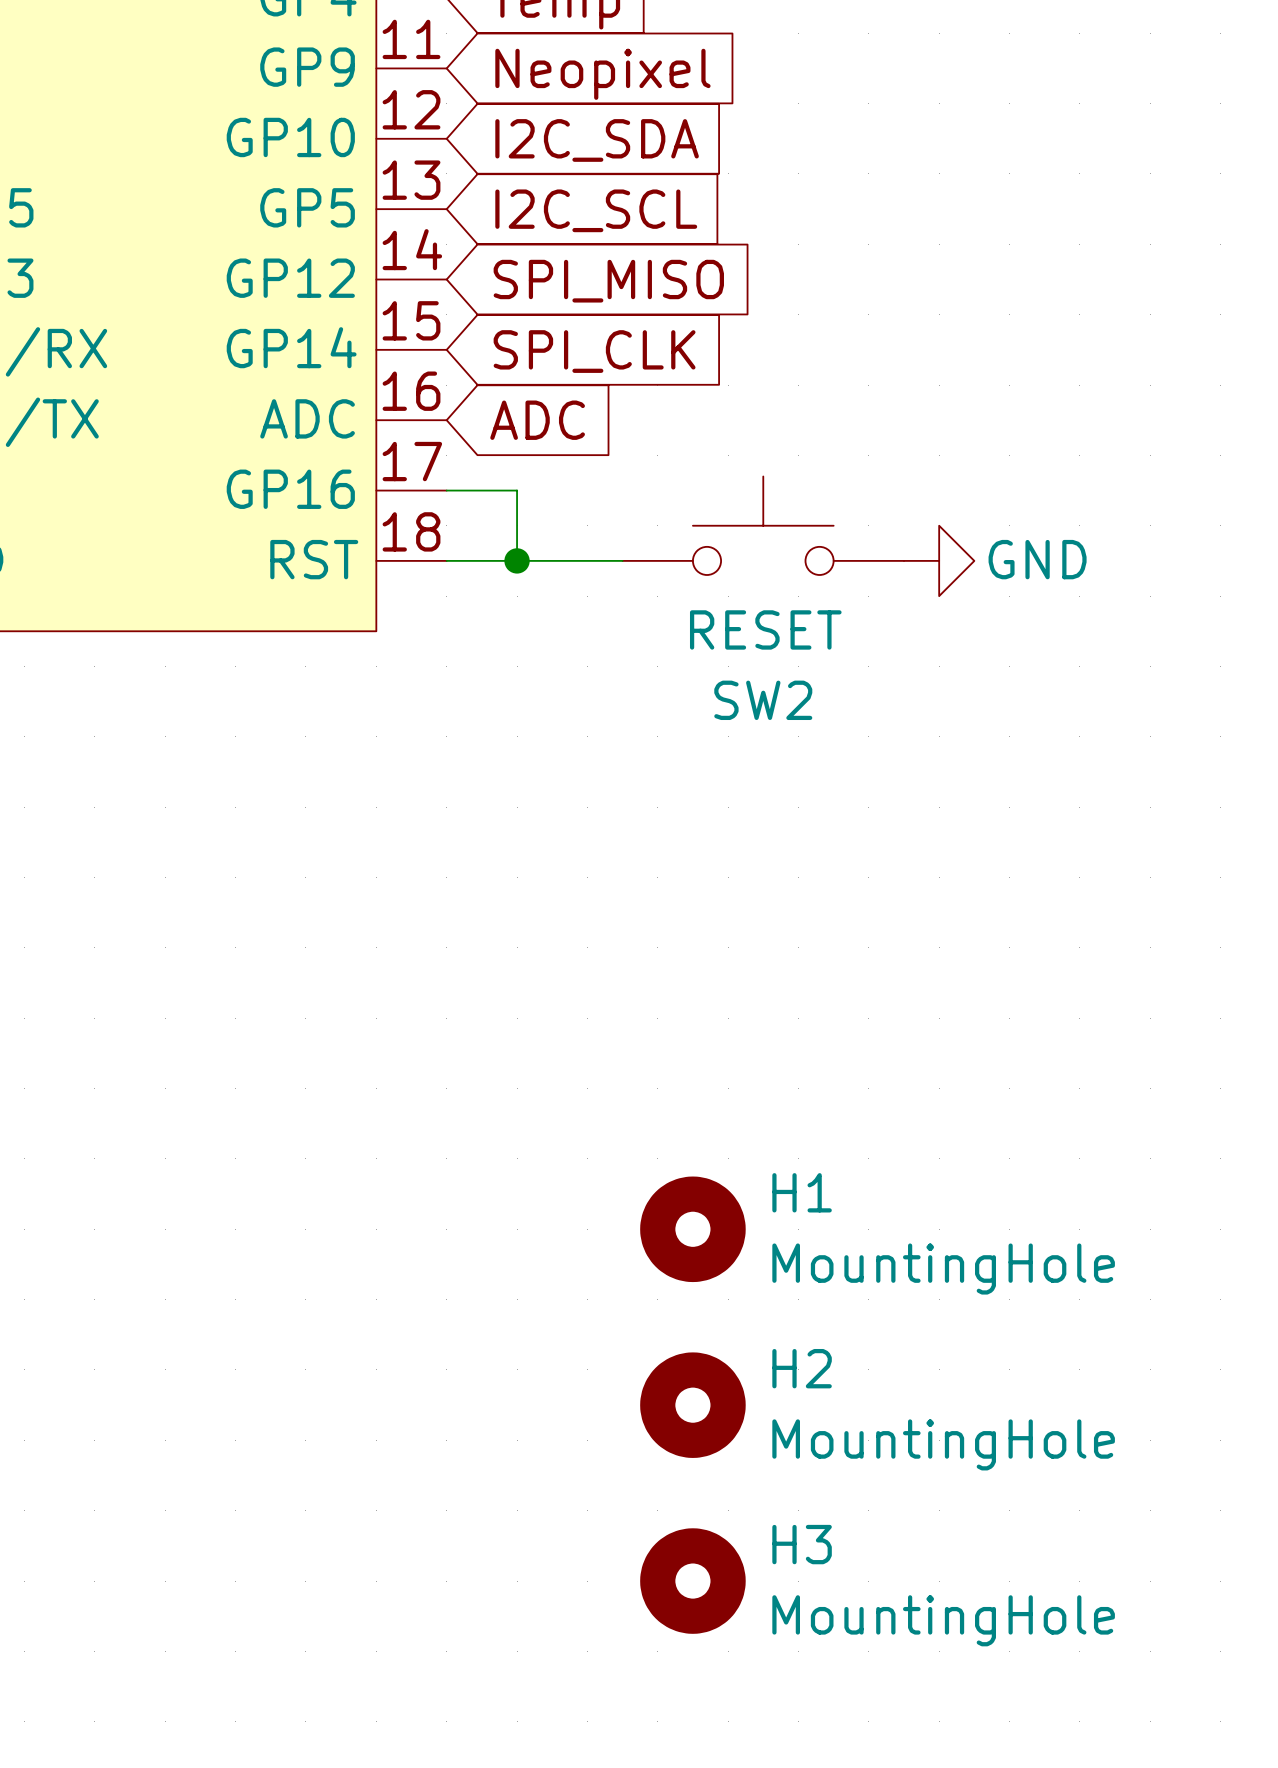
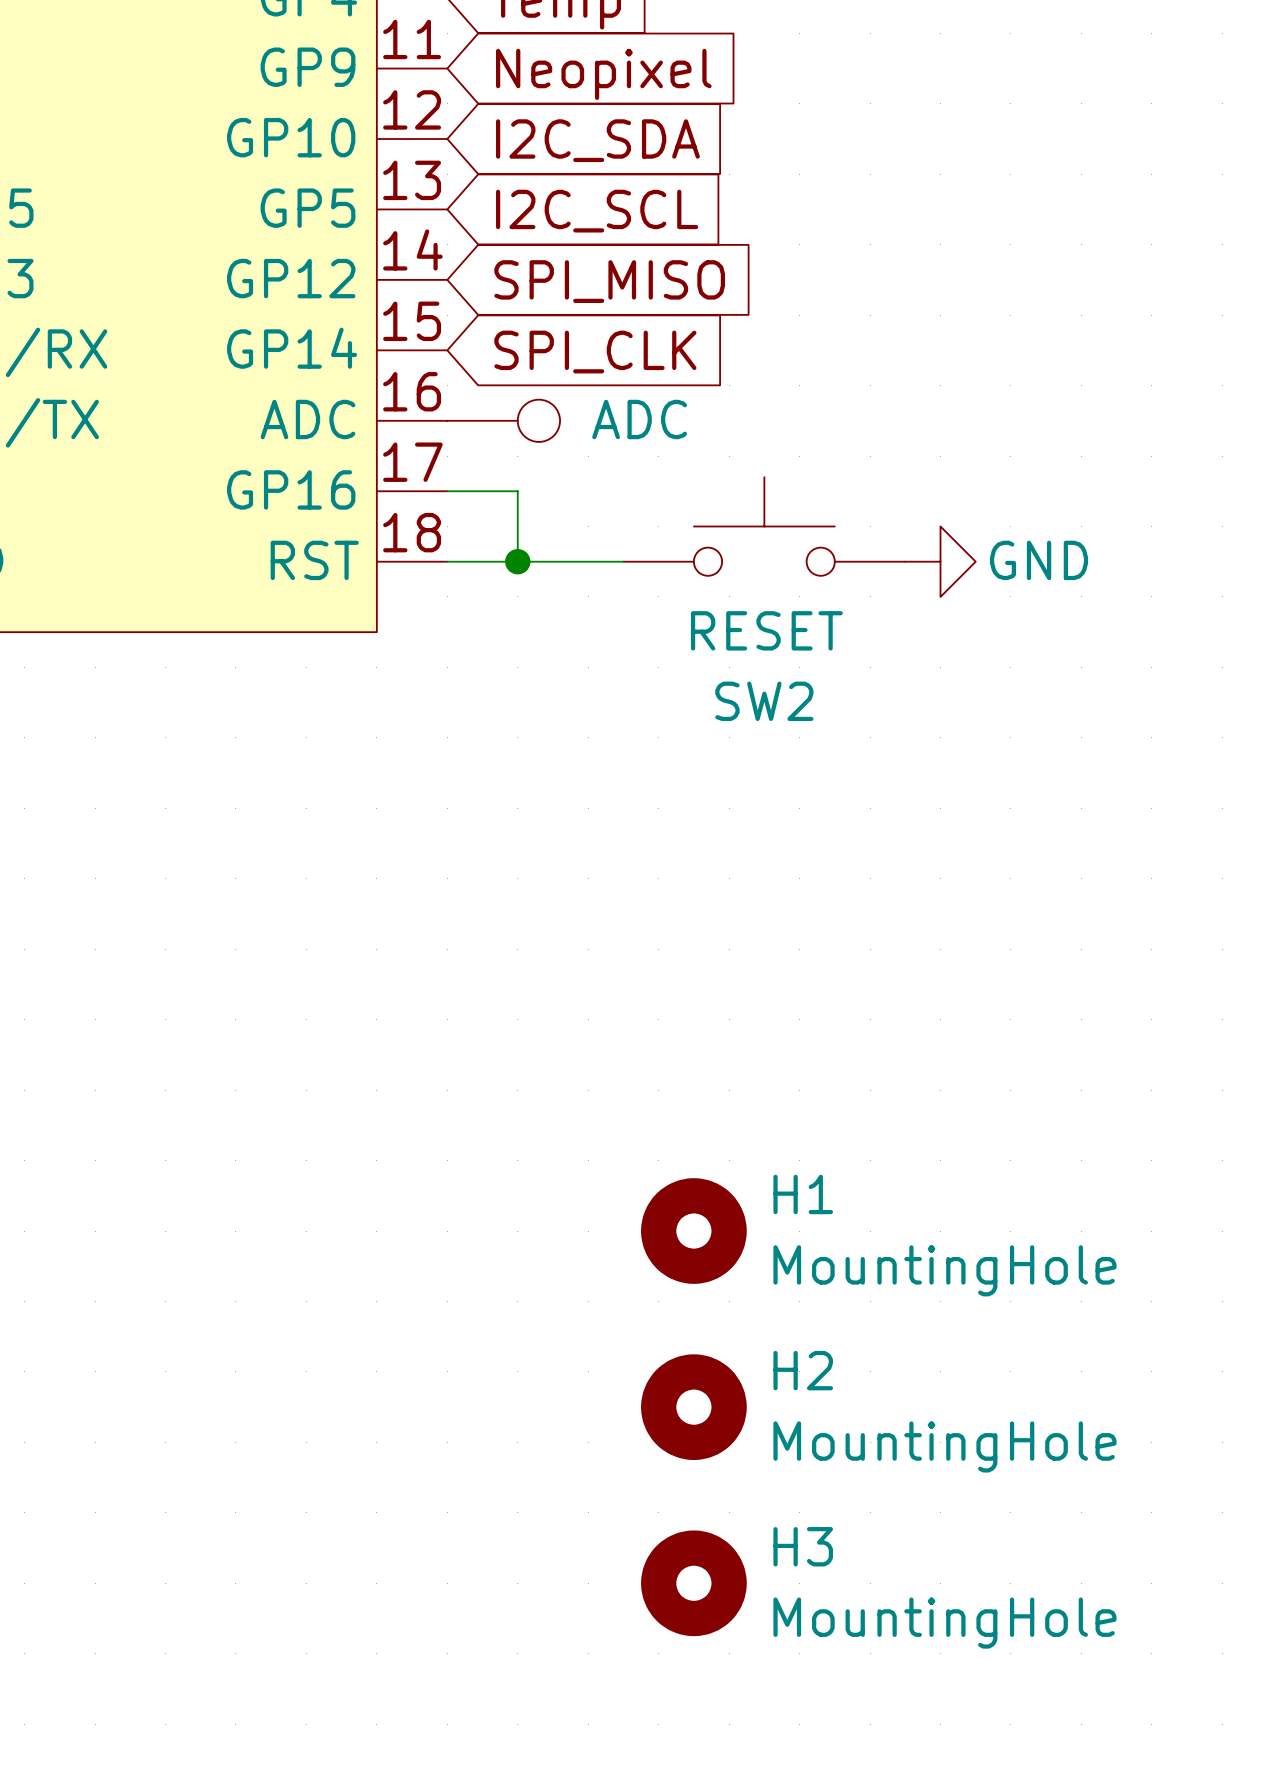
part: none -> ADC (503, 420)
global label: ADC (537, 420) -> none

